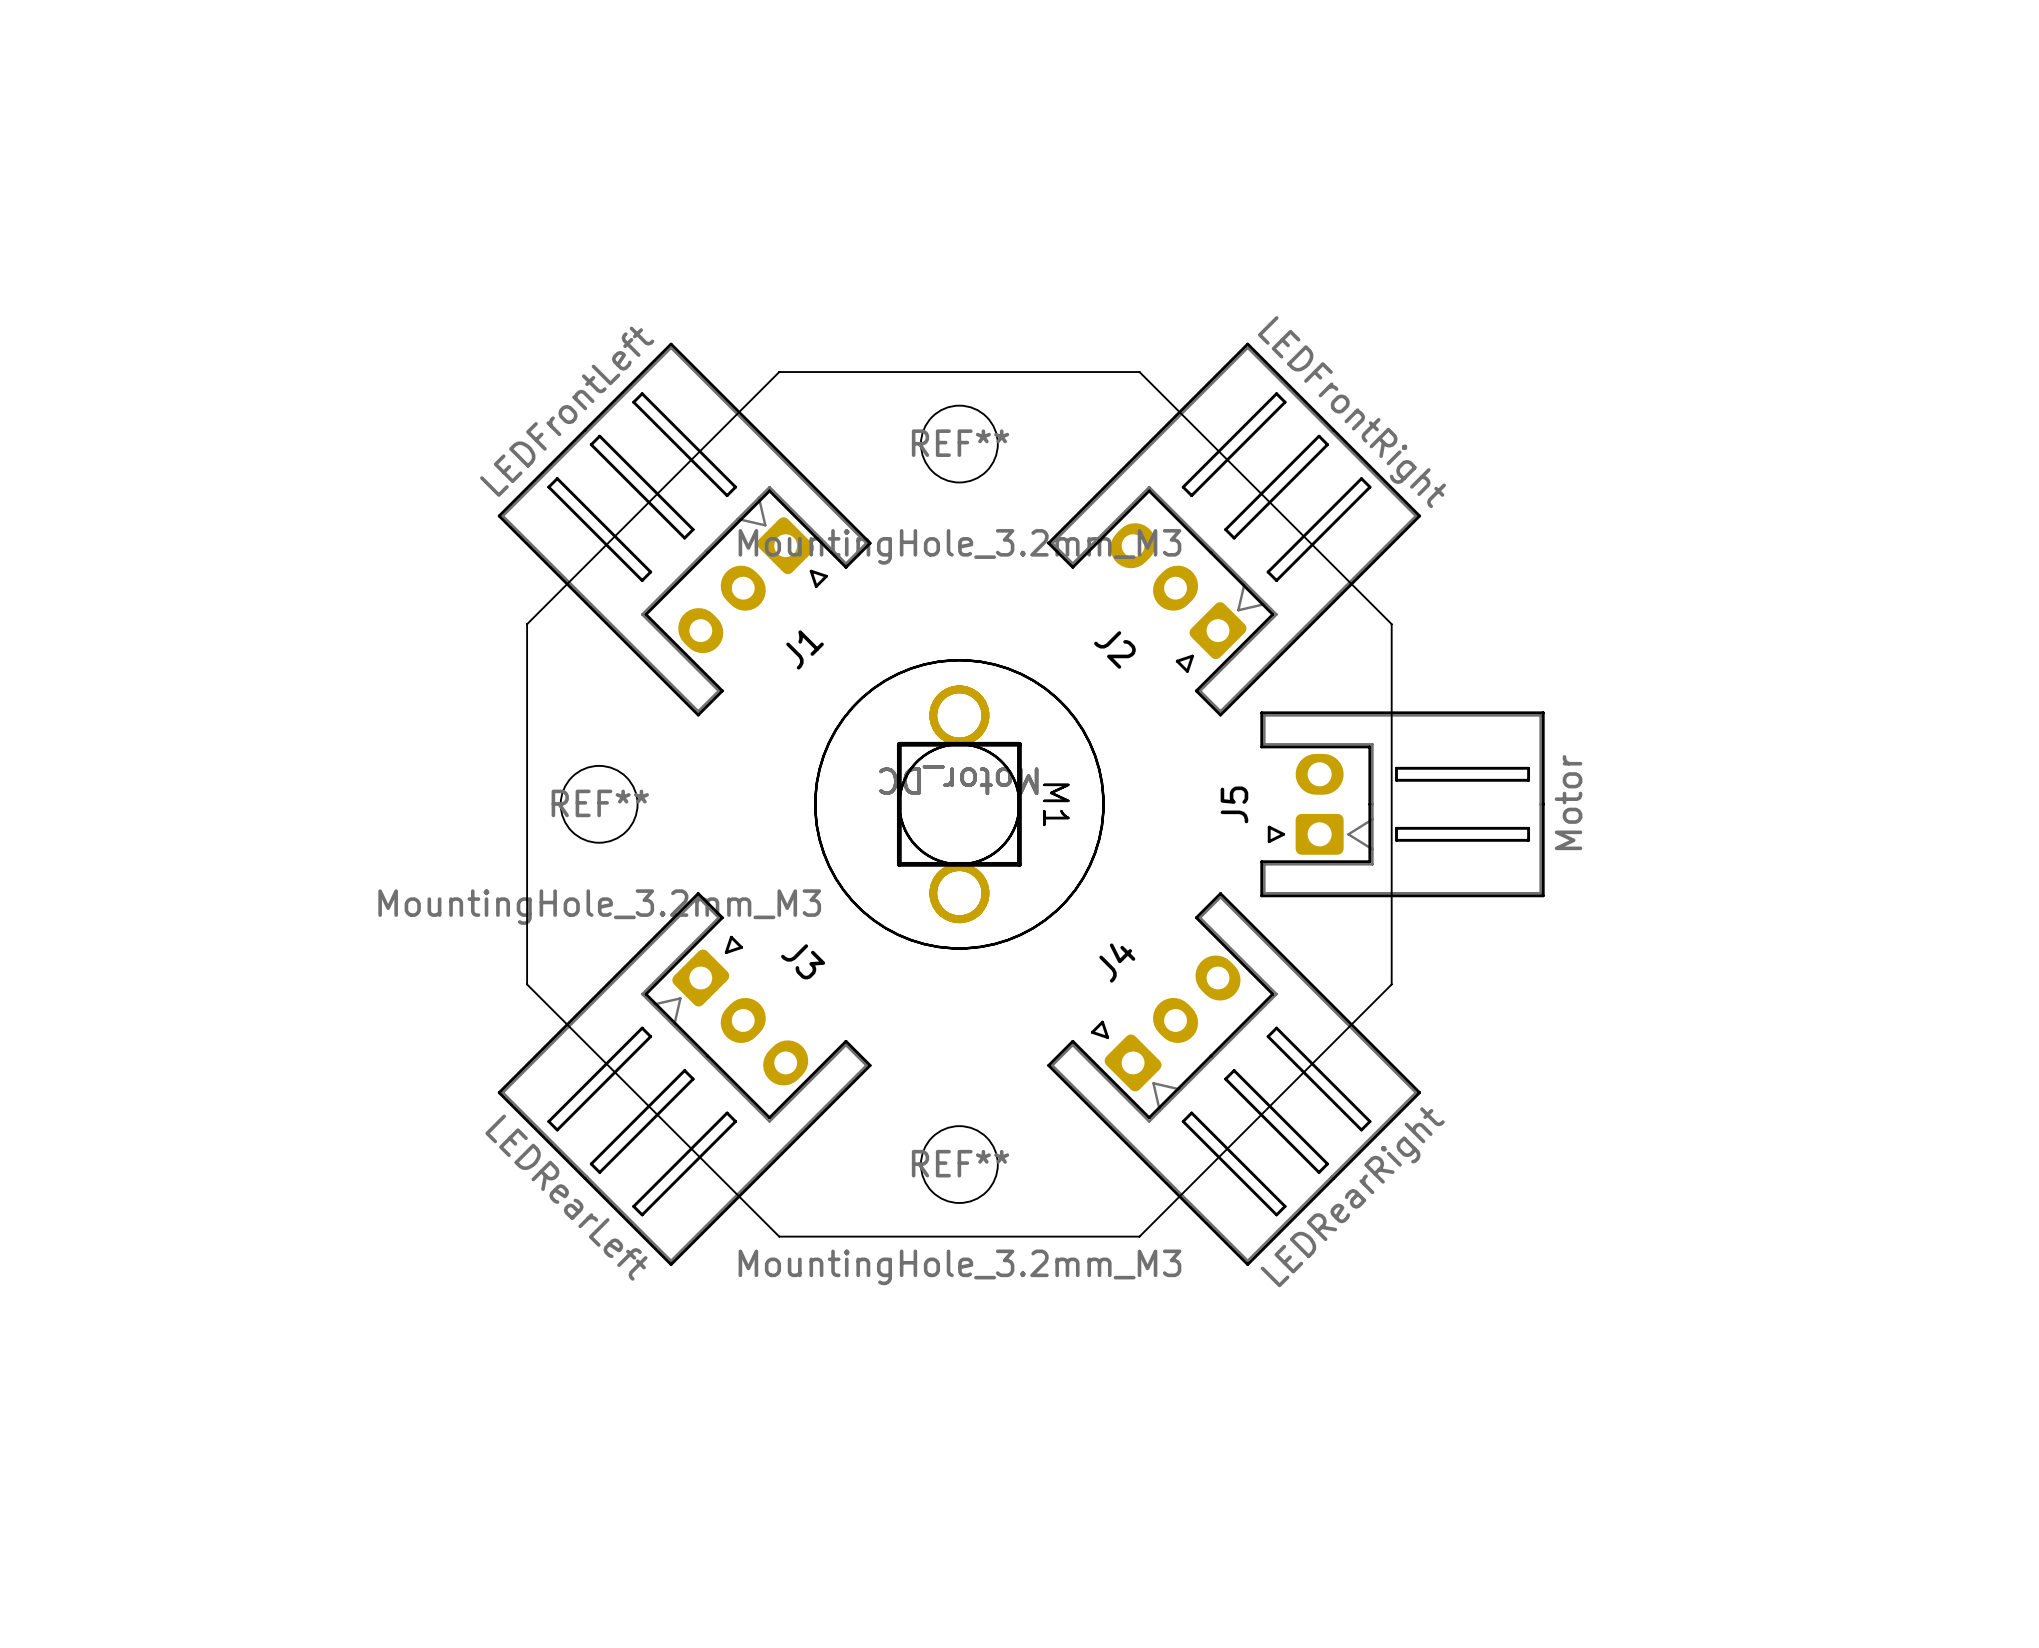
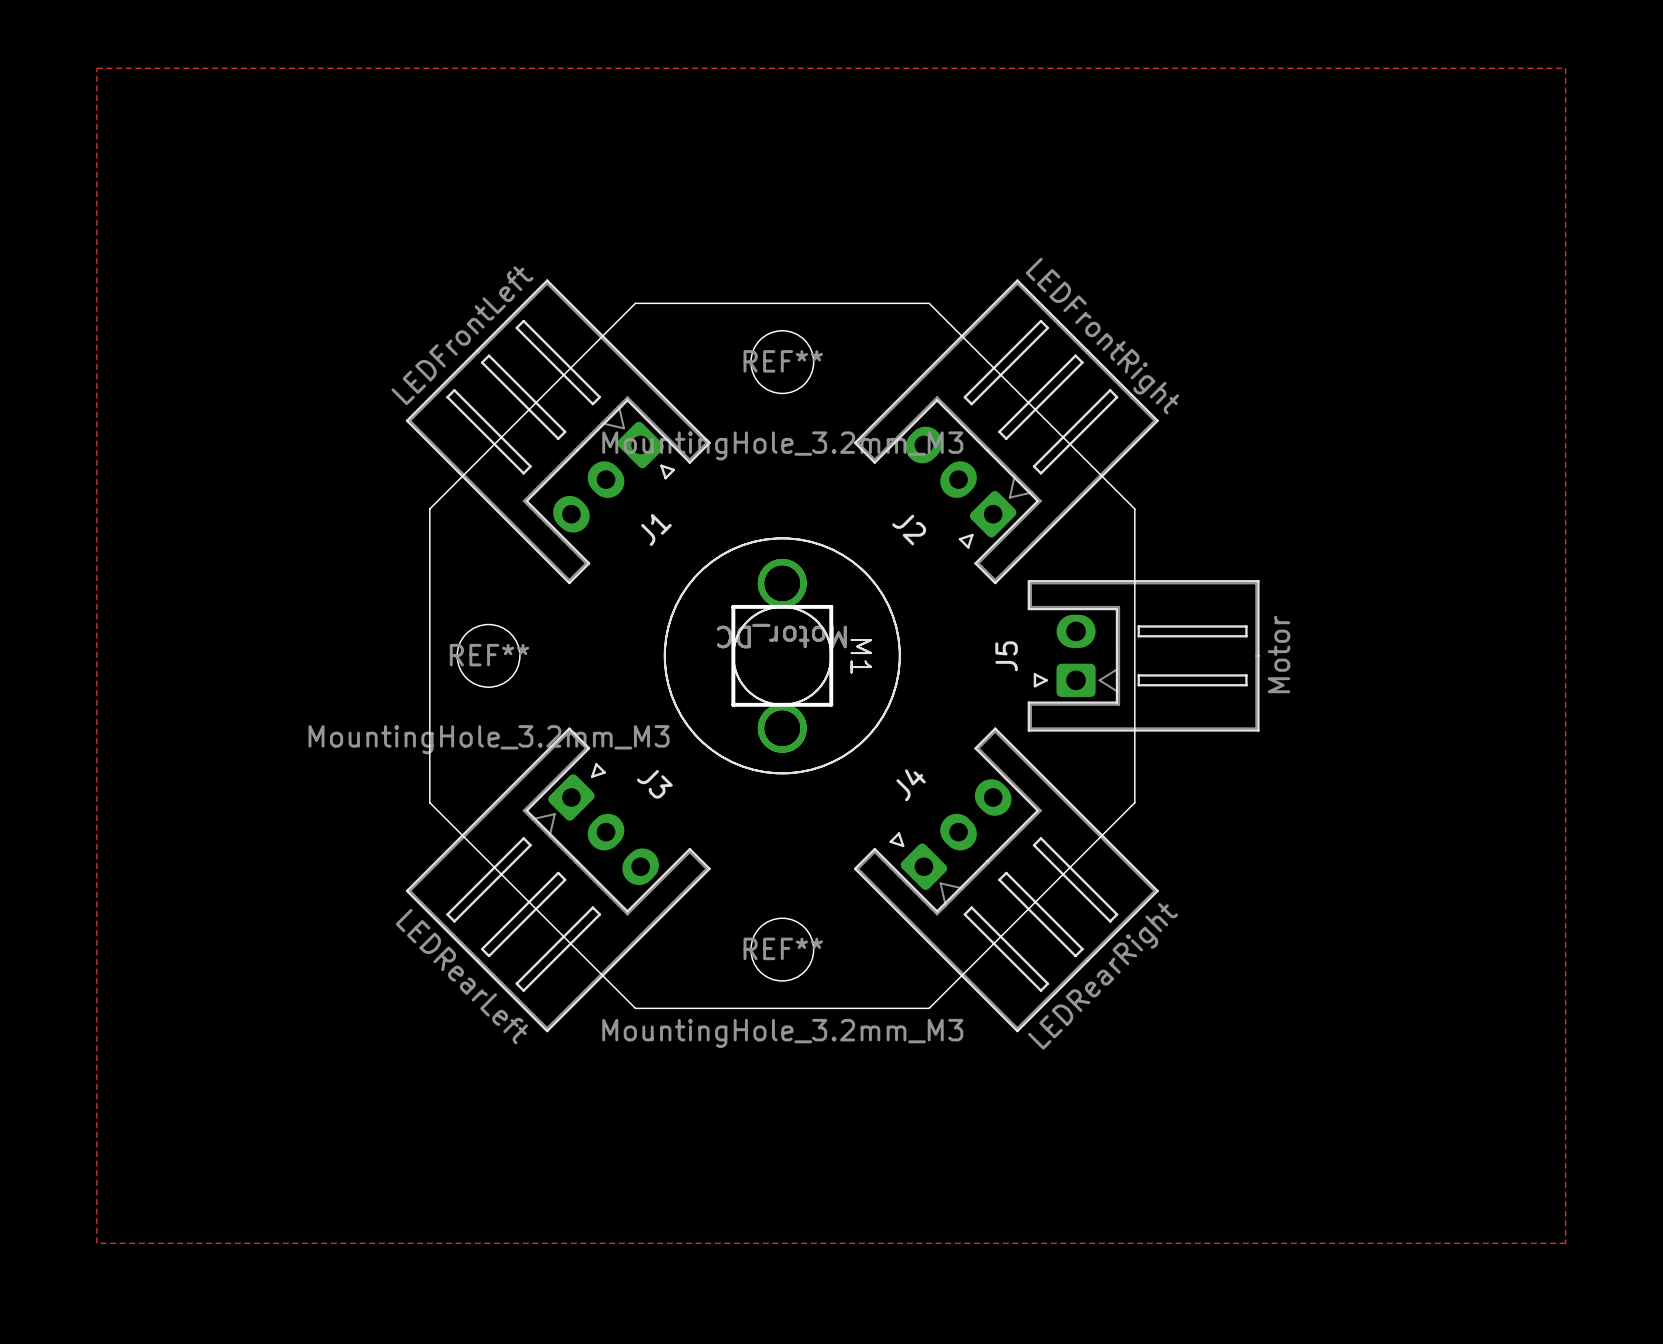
zone outline: none -> (96, 68) (1565, 68) (1565, 1243) (96, 1243) (96, 68)

